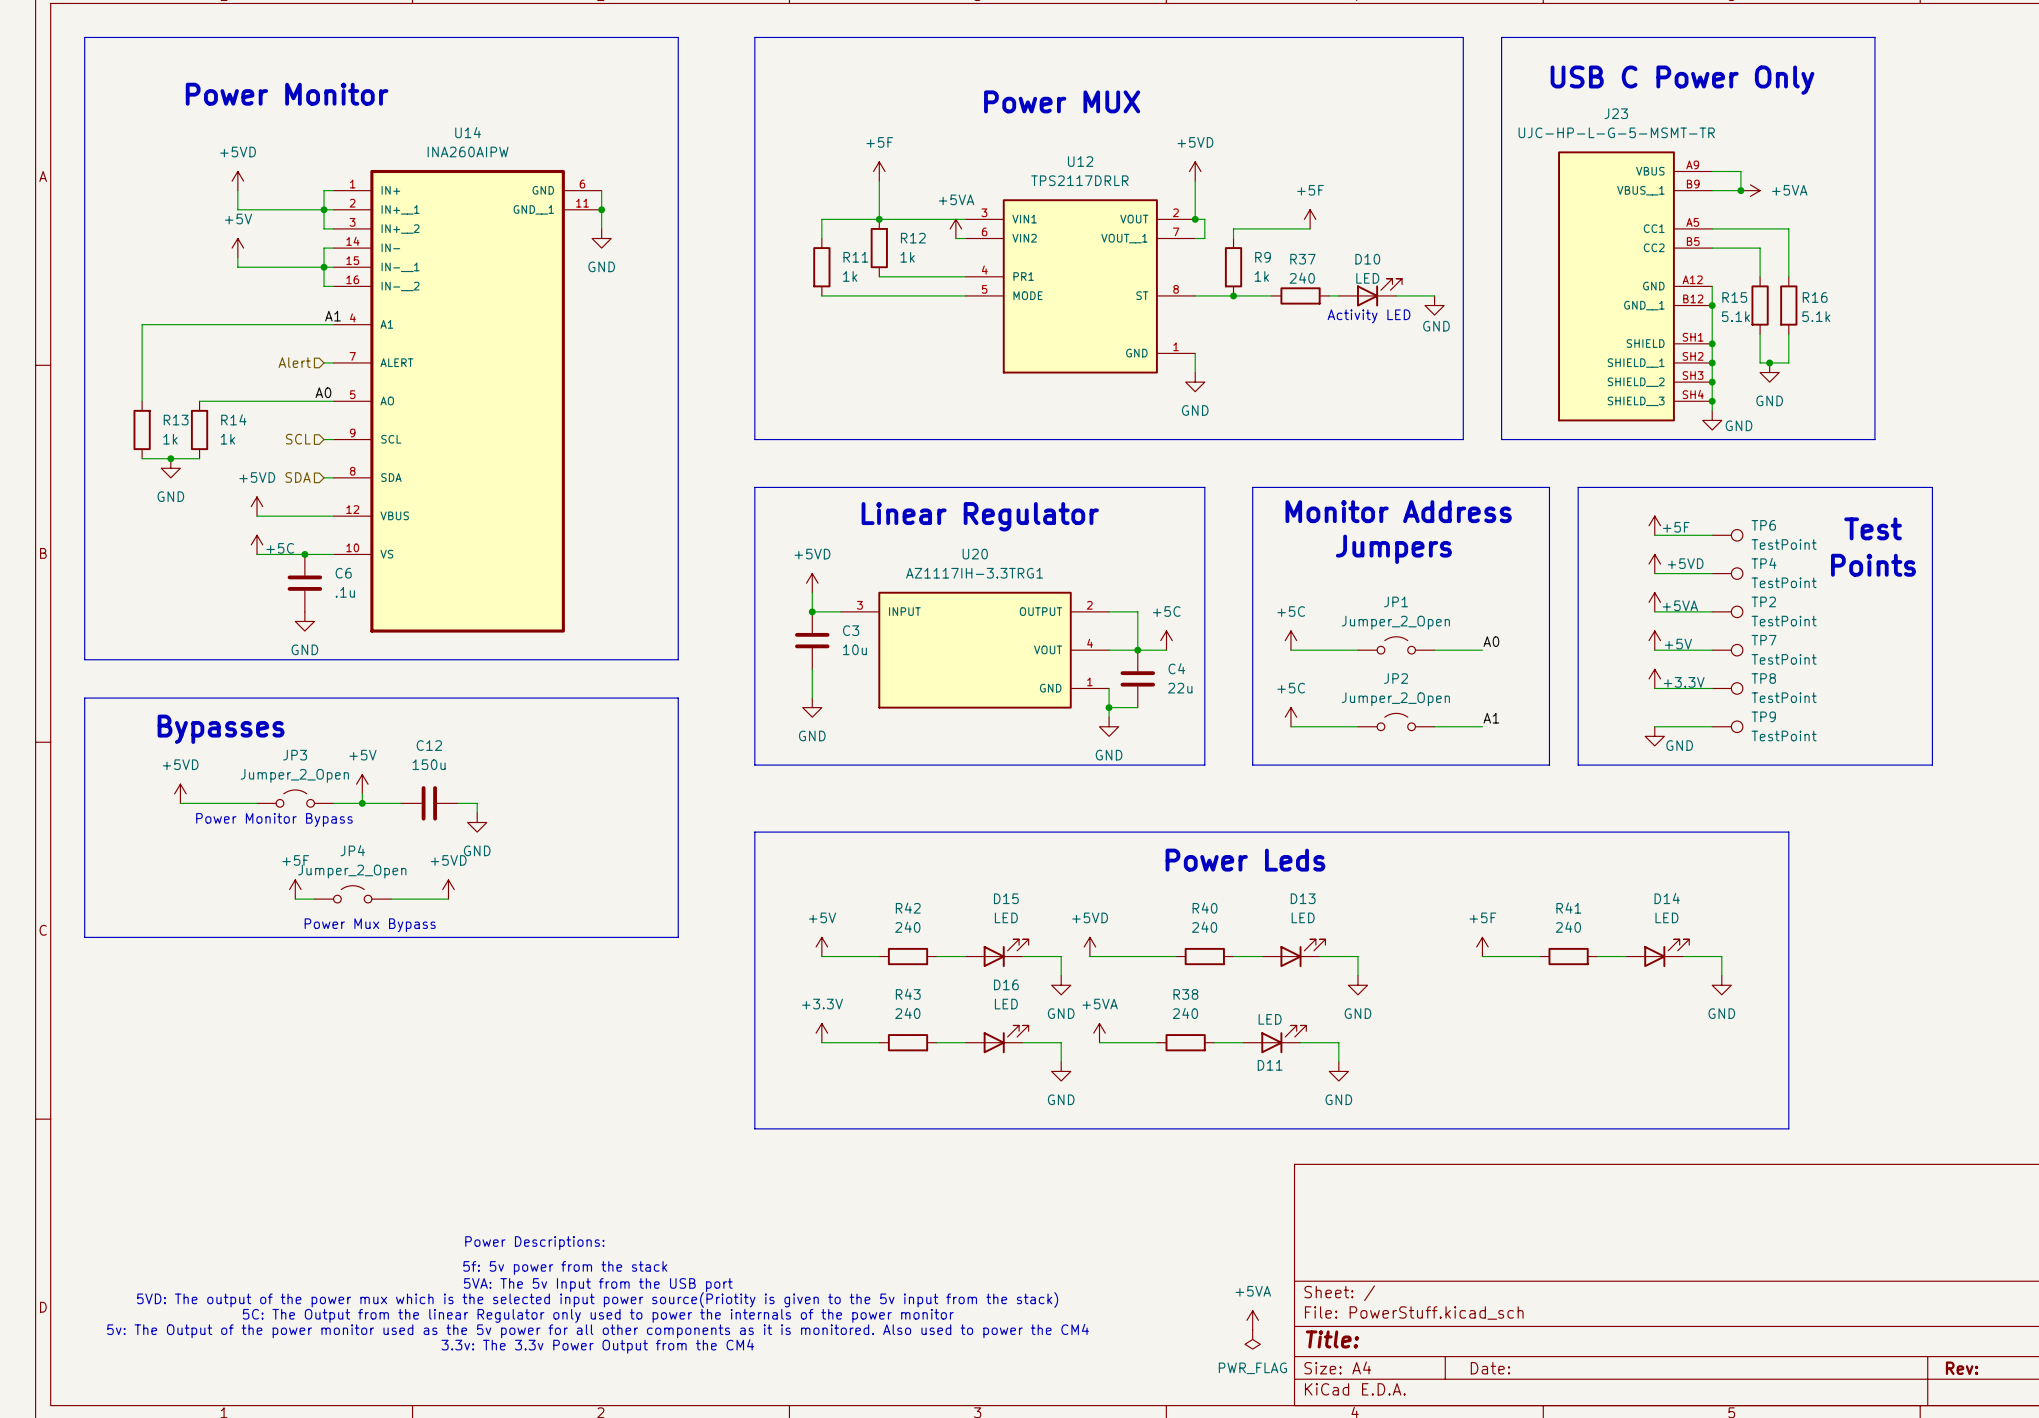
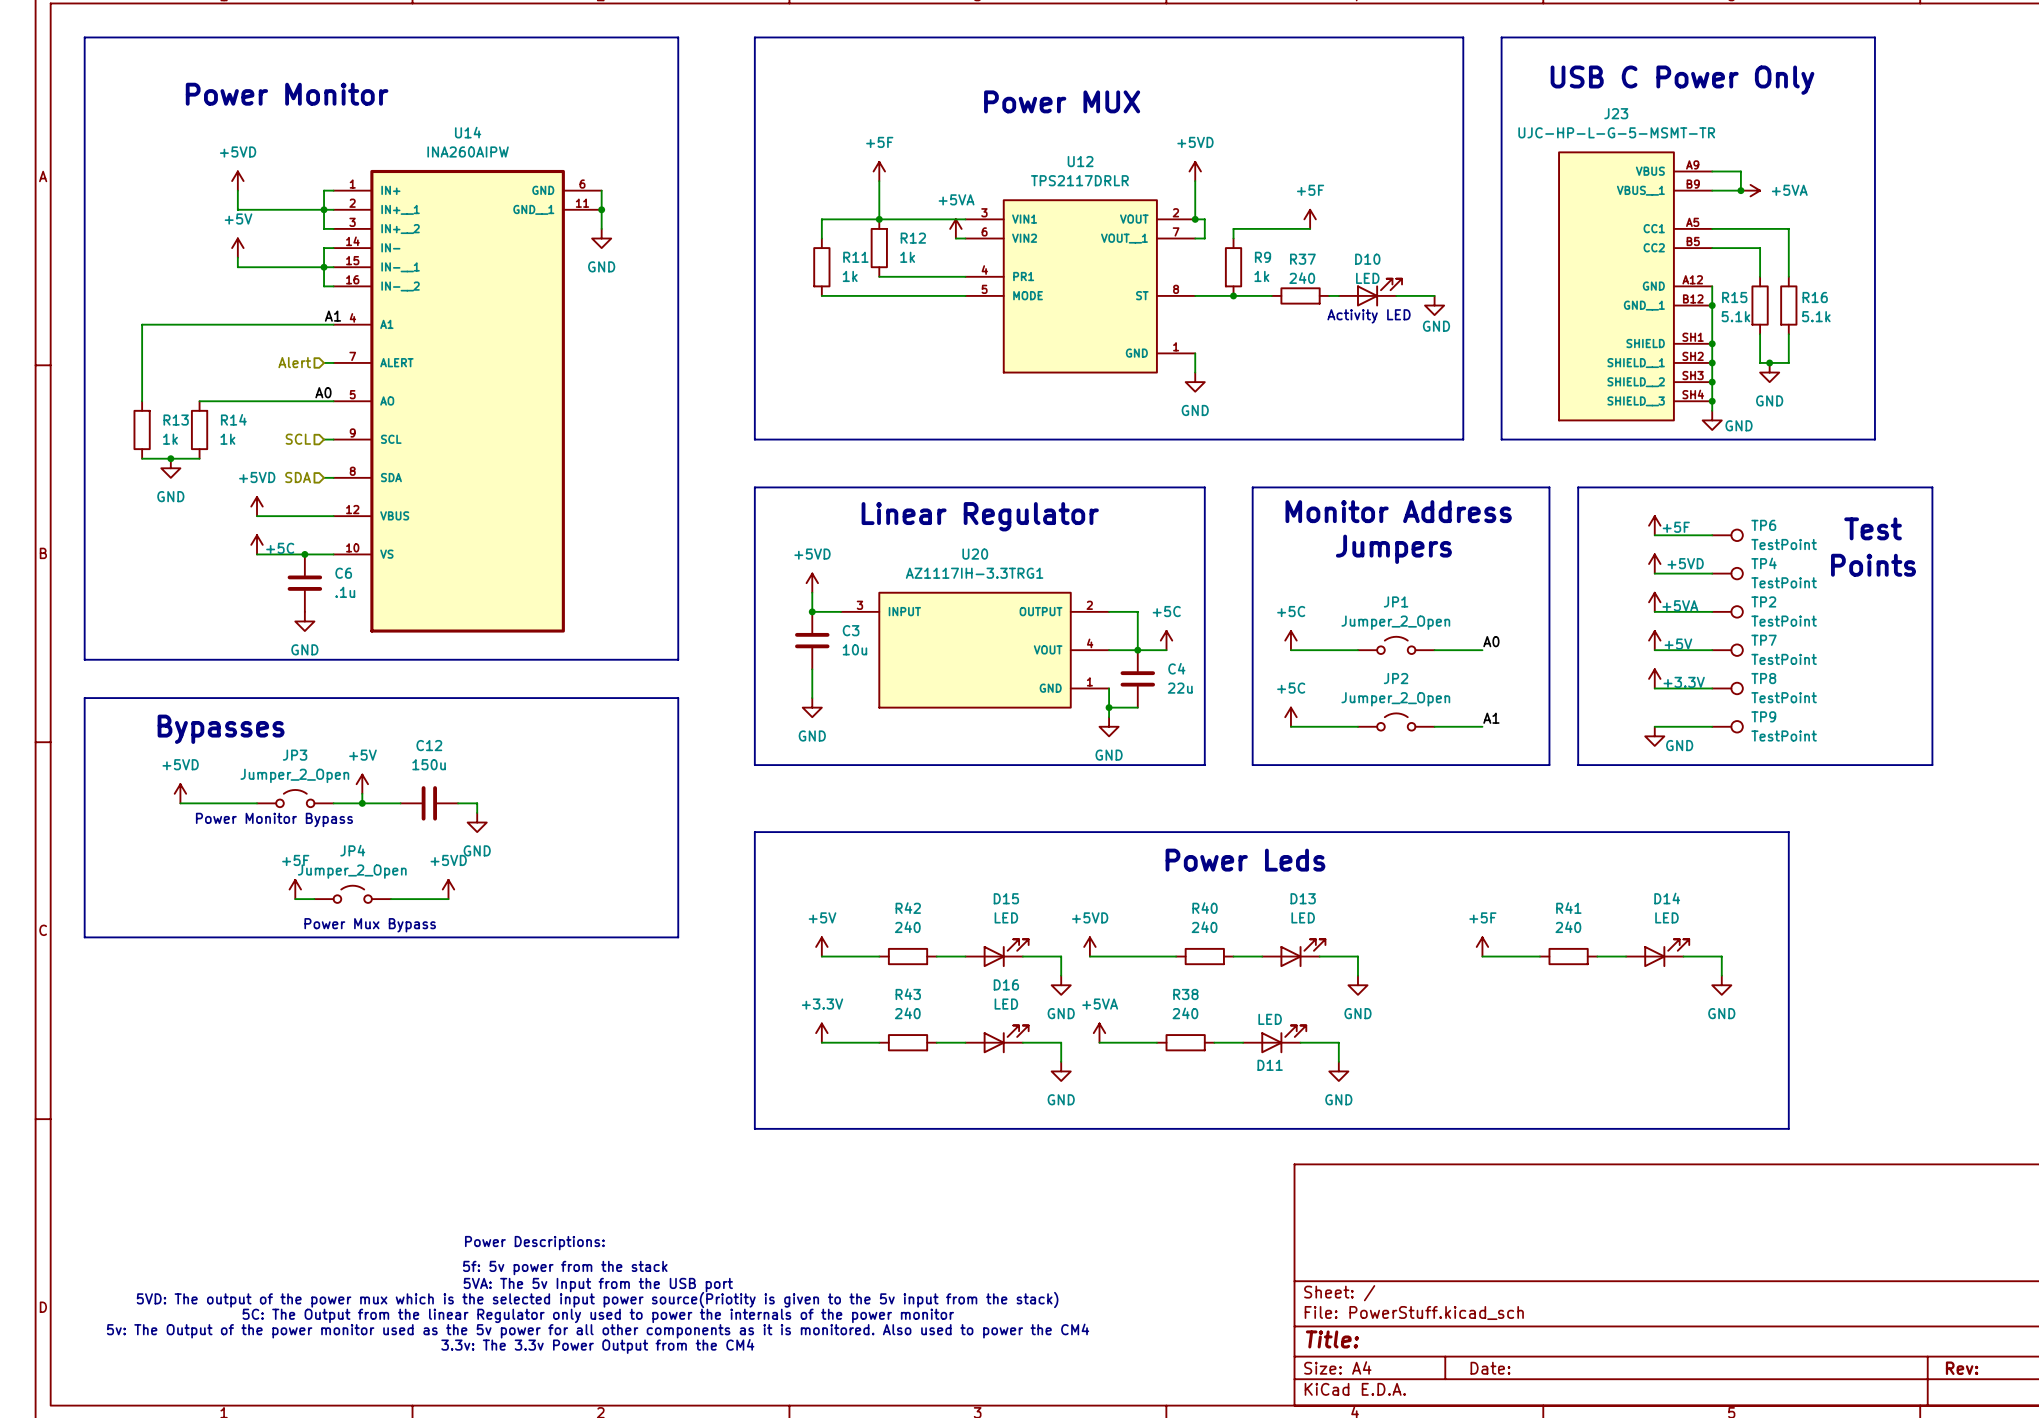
power symbol: +5VA (1252, 1320) -> none
power symbol: PWR_FLAG (1252, 1339) -> none

